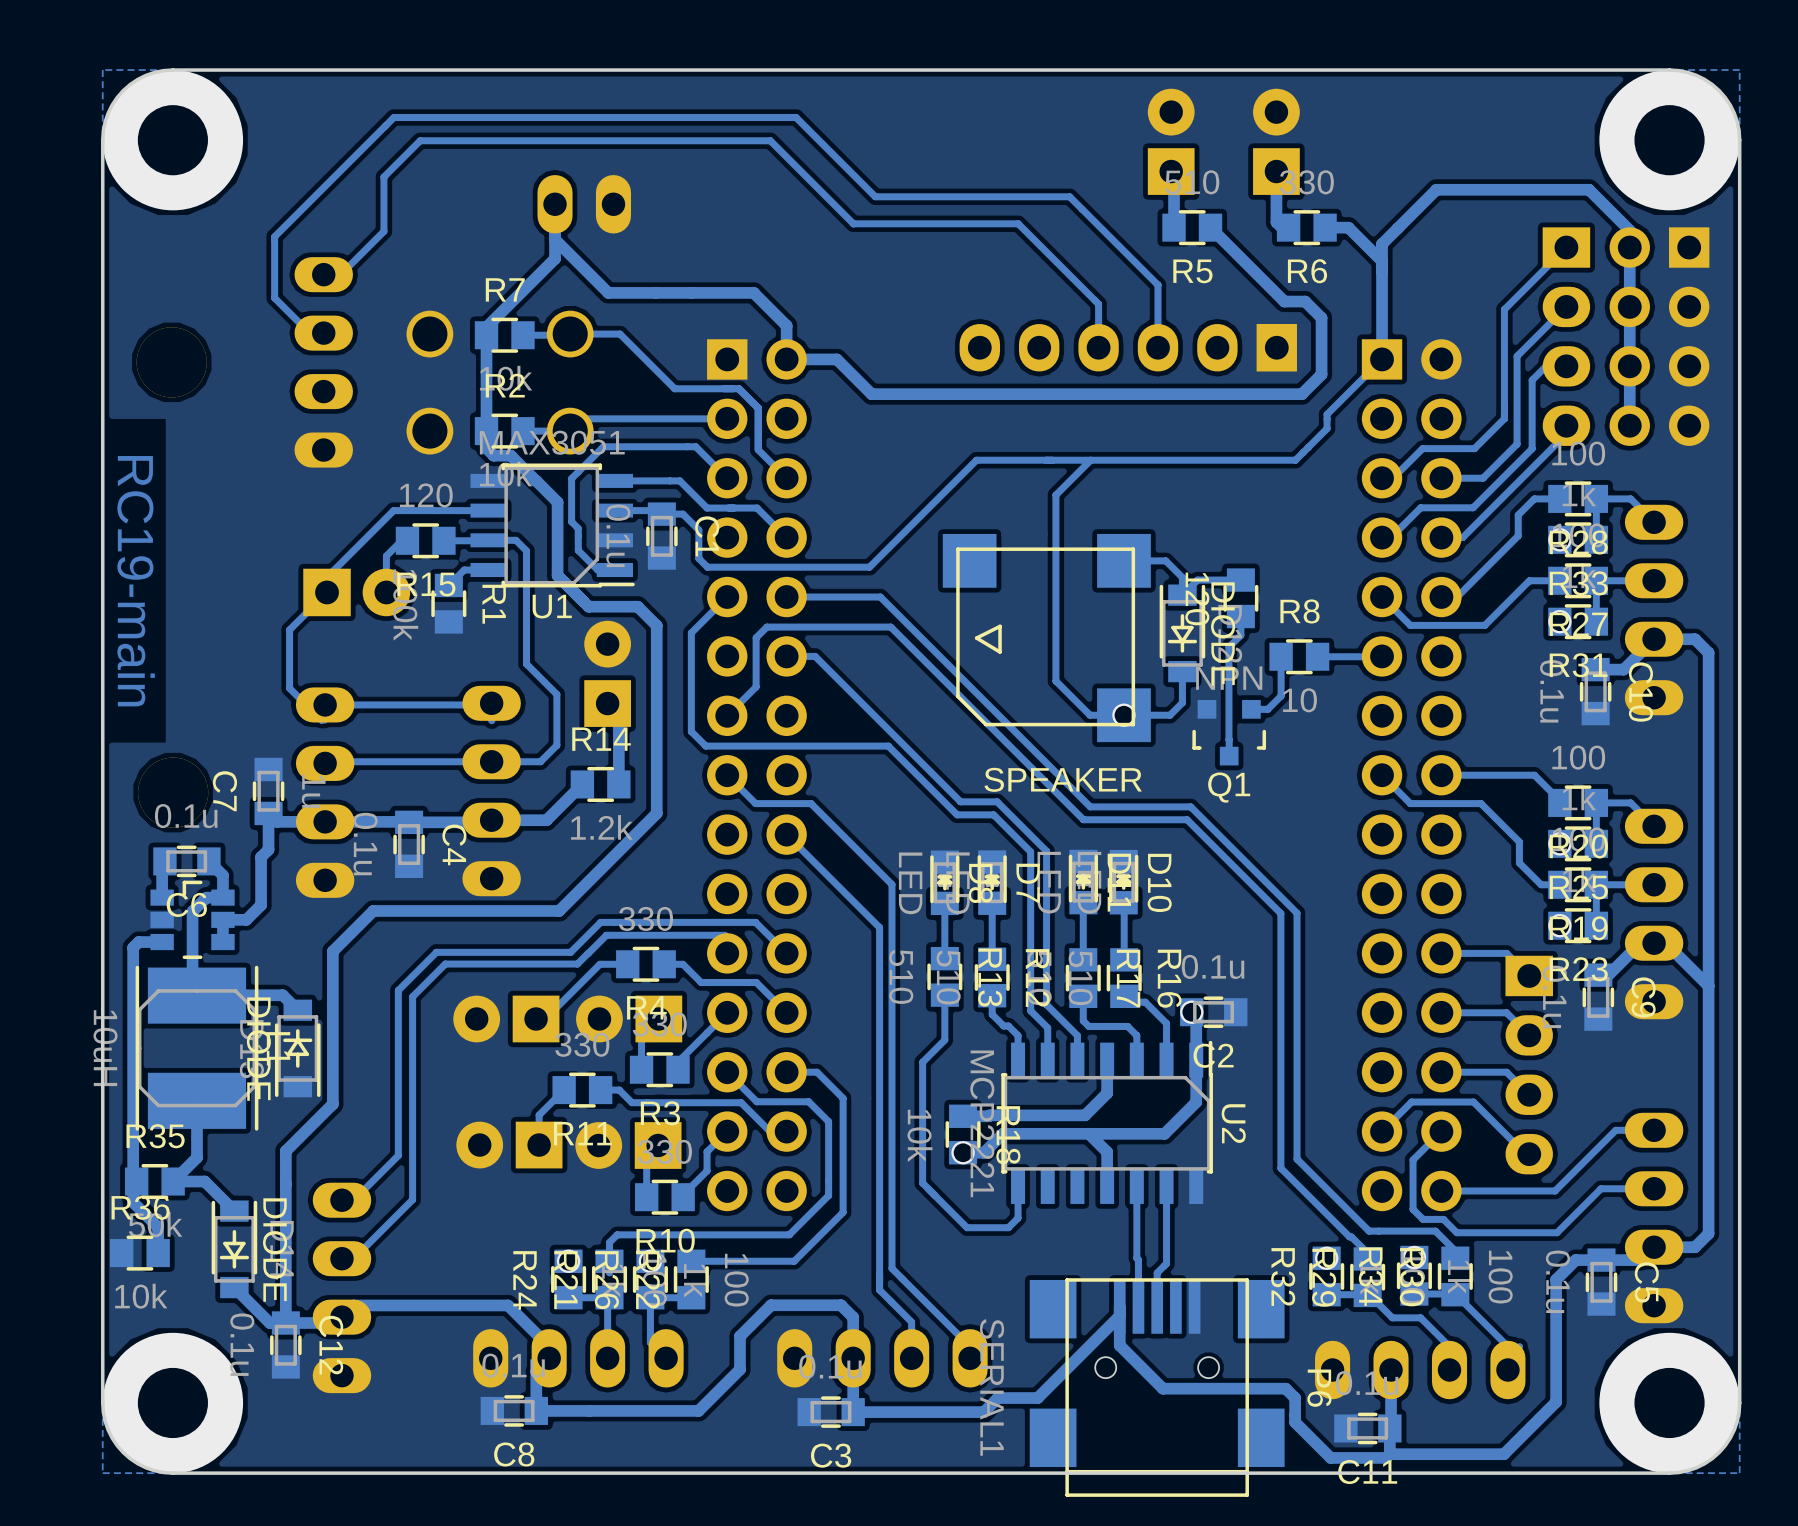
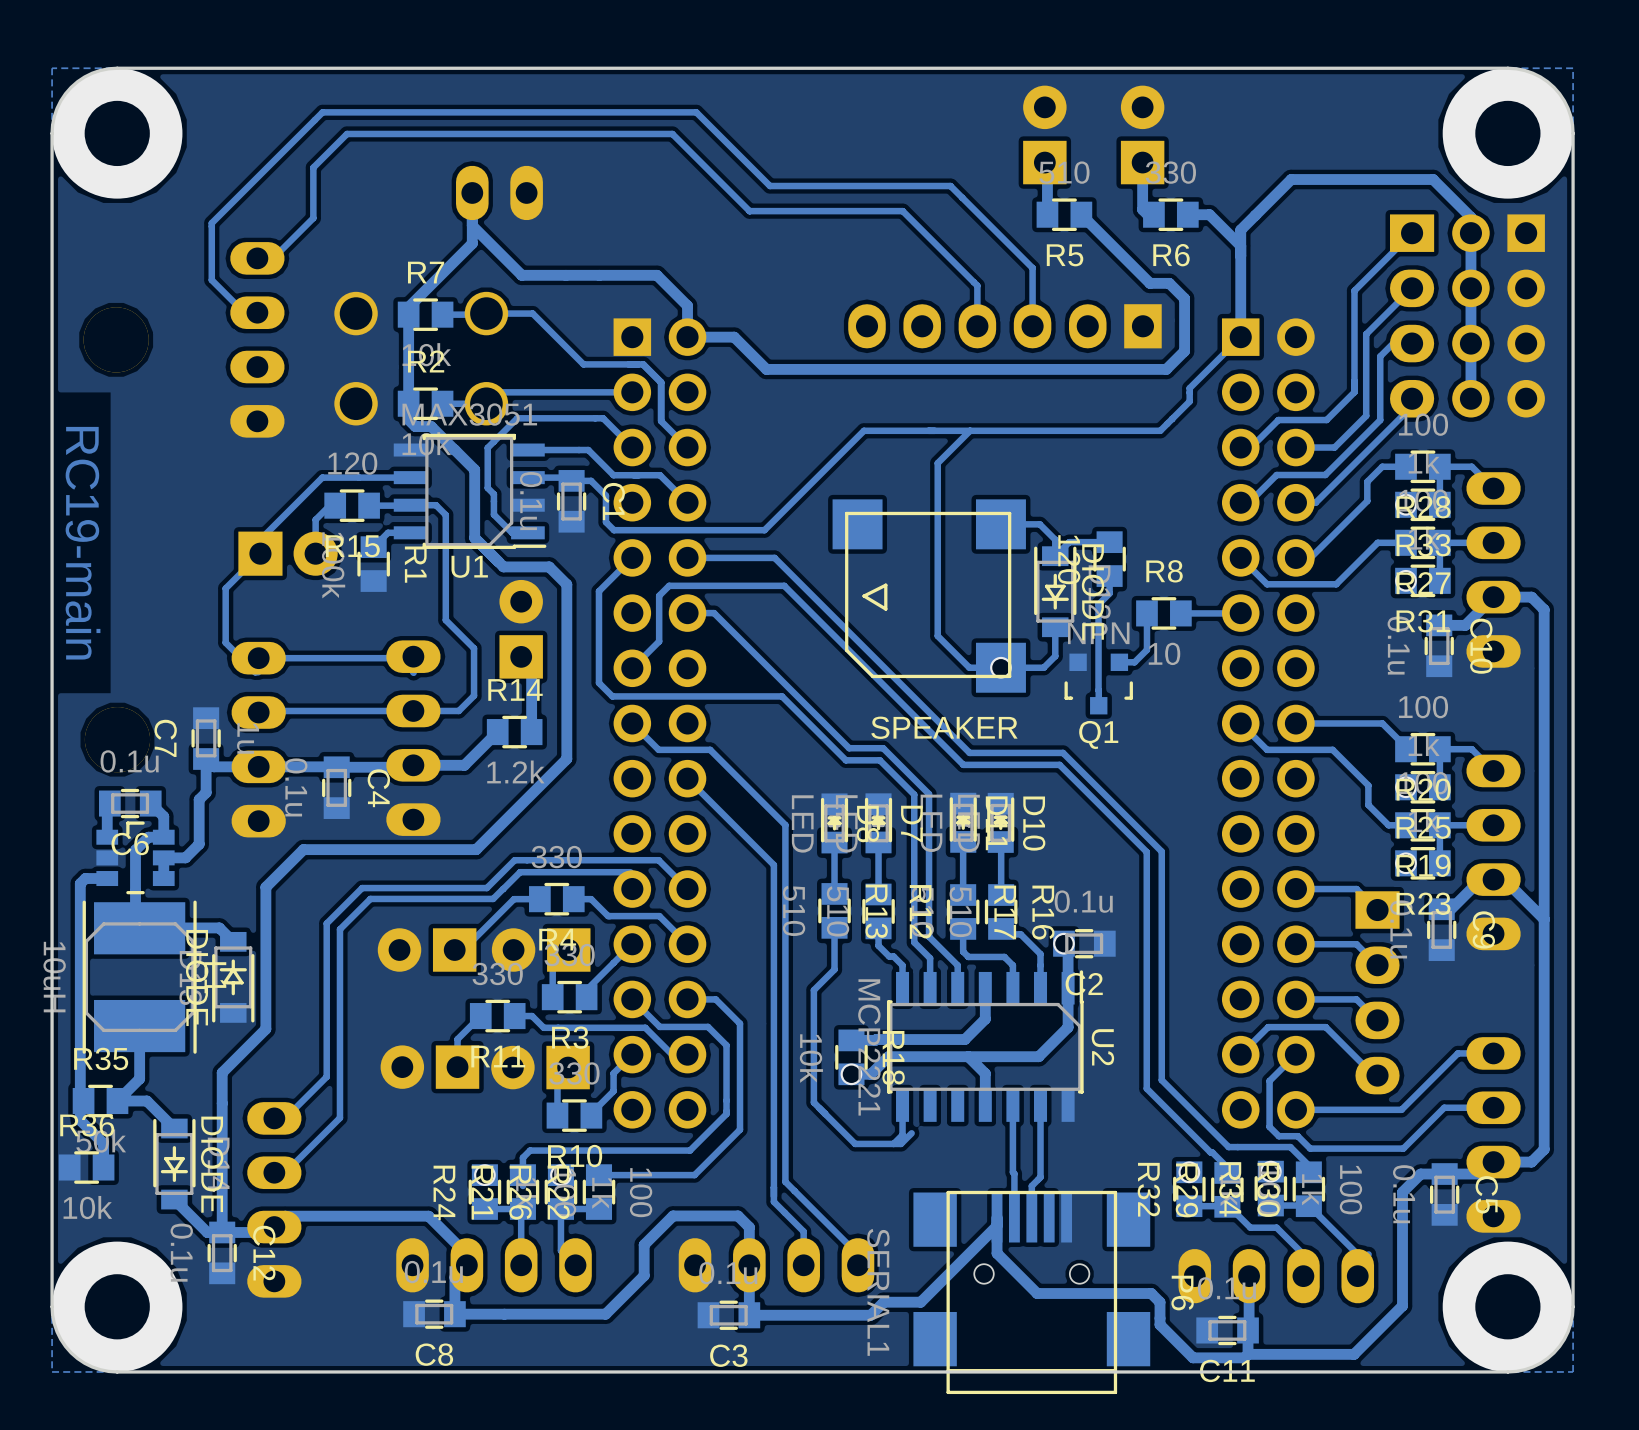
track: none -> (911, 1133) (901, 1143) (893, 1143)

